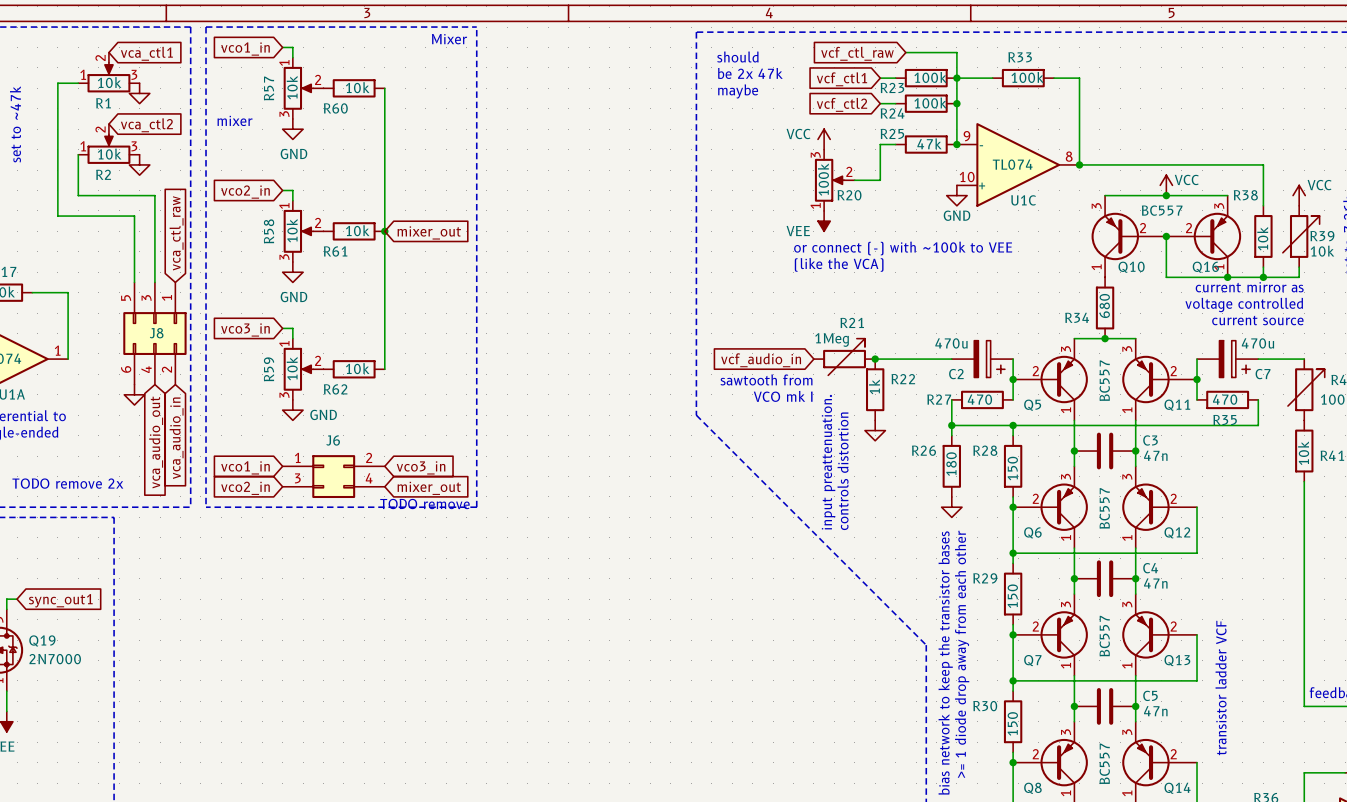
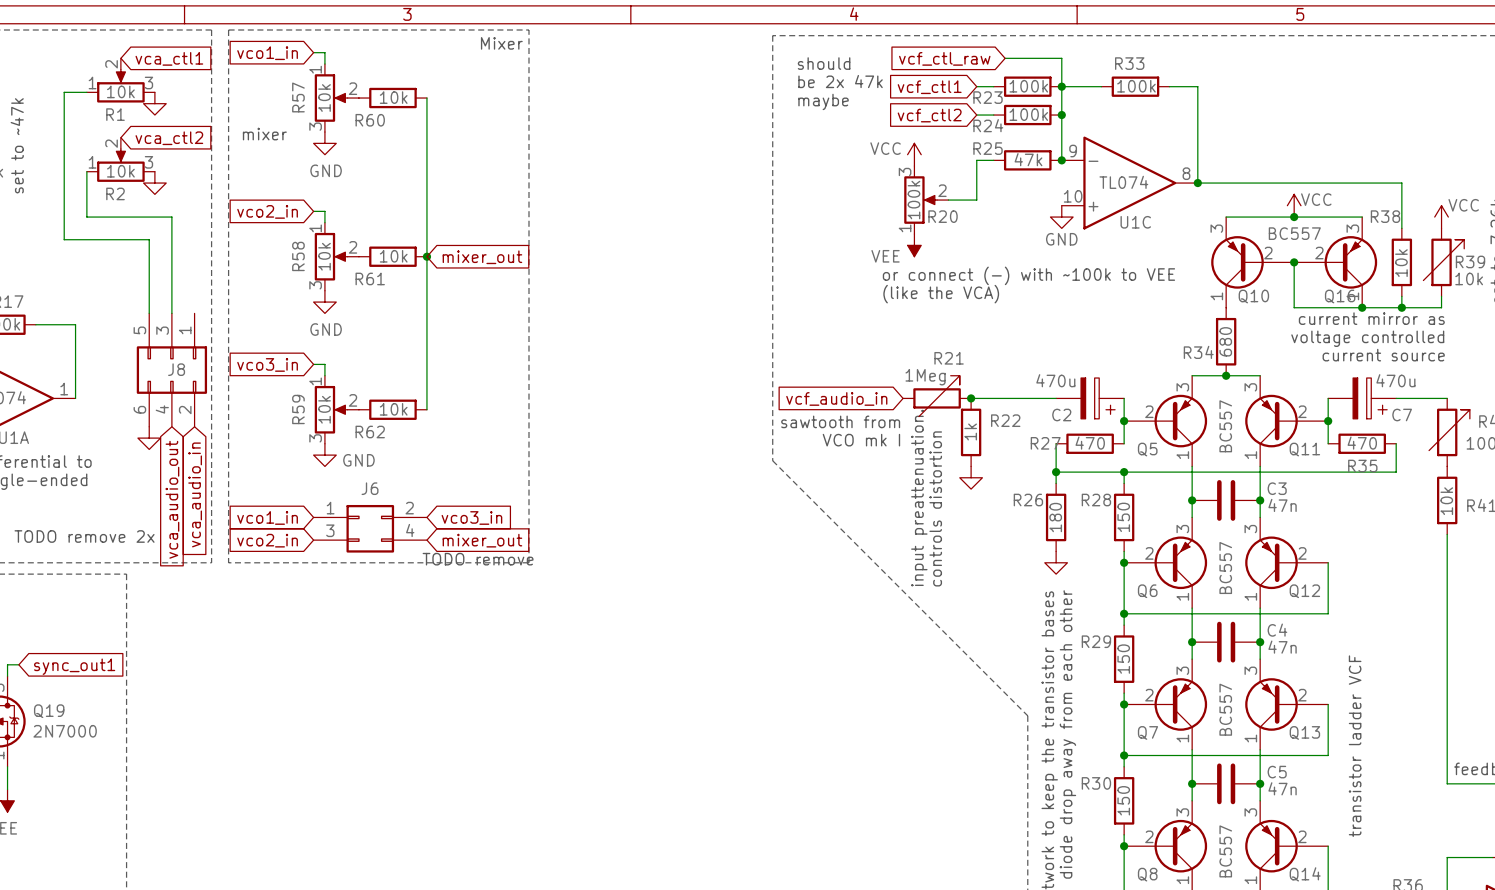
global label: vca_ctl_raw (176, 233) -> none

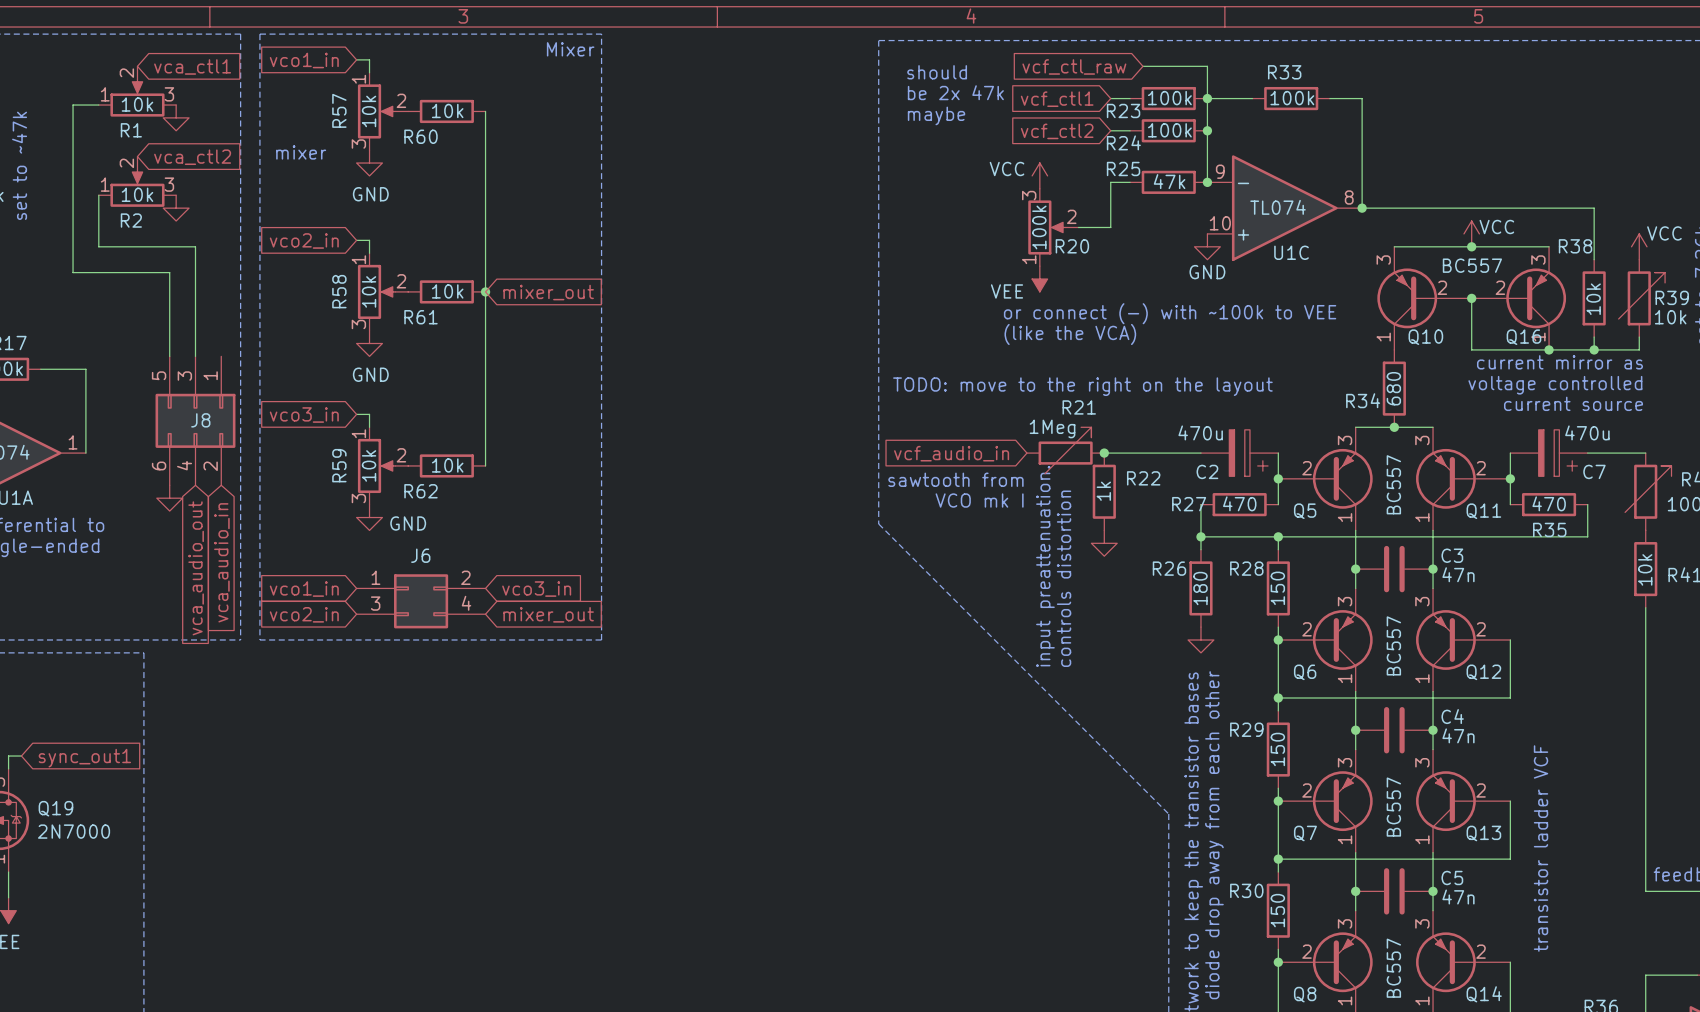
text: none -> TODO: move to the right on the layout (1082, 386)
text: TODO remove 2x (84, 536) -> none
text: TODO remove (478, 559) -> none

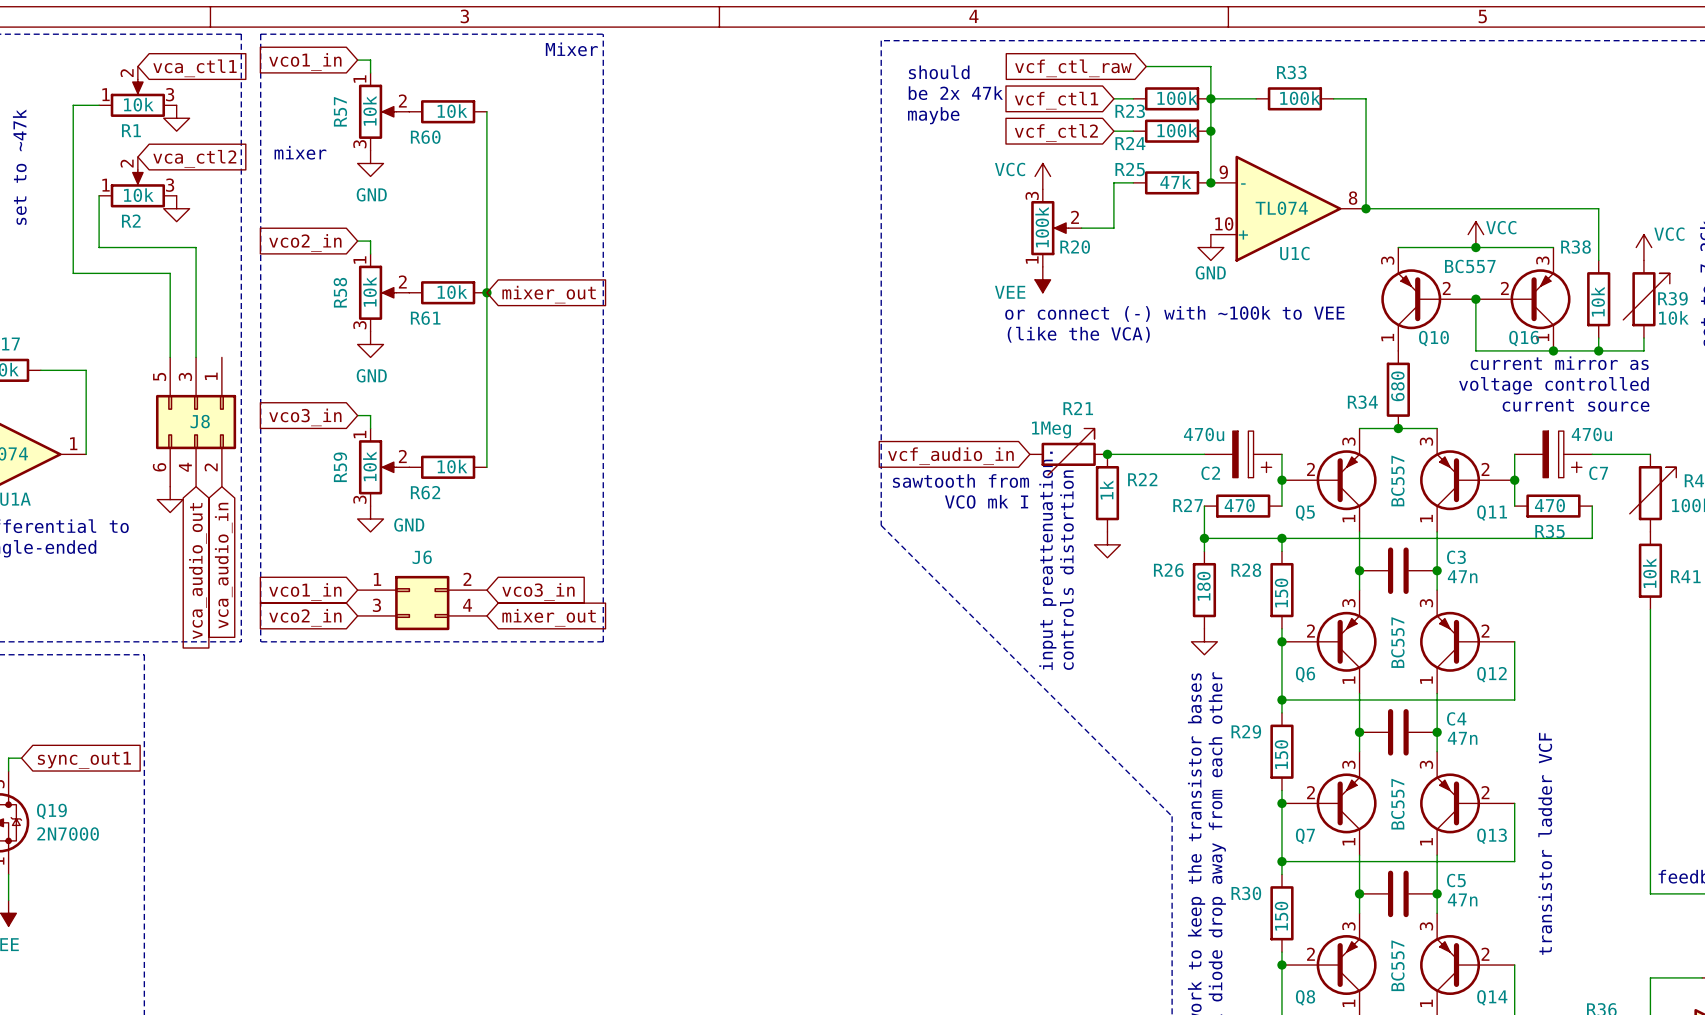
text: TODO: move to the right on the layout (1082, 386) -> none

